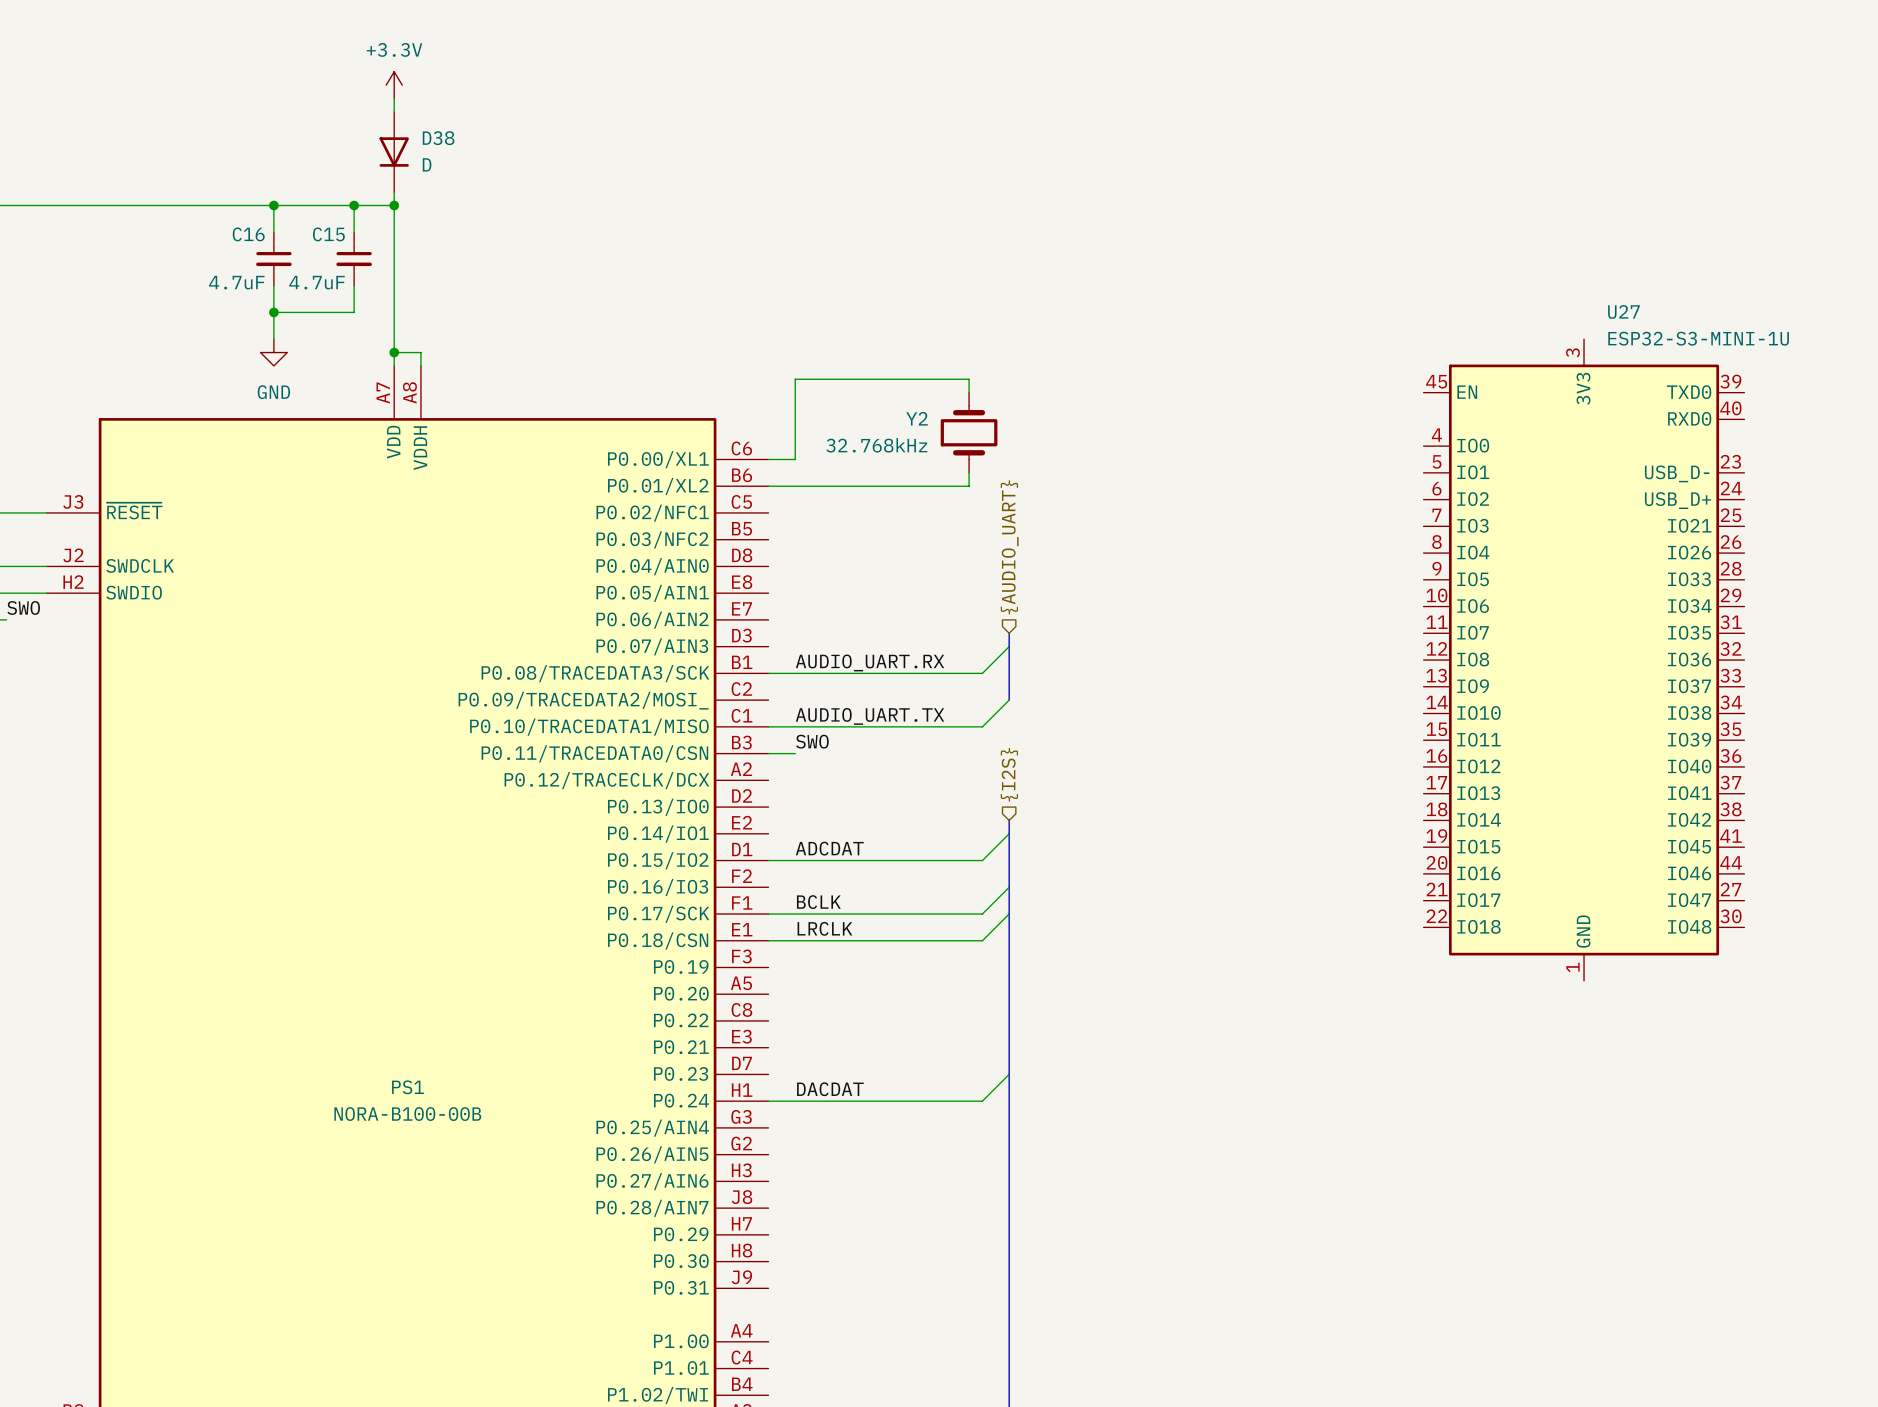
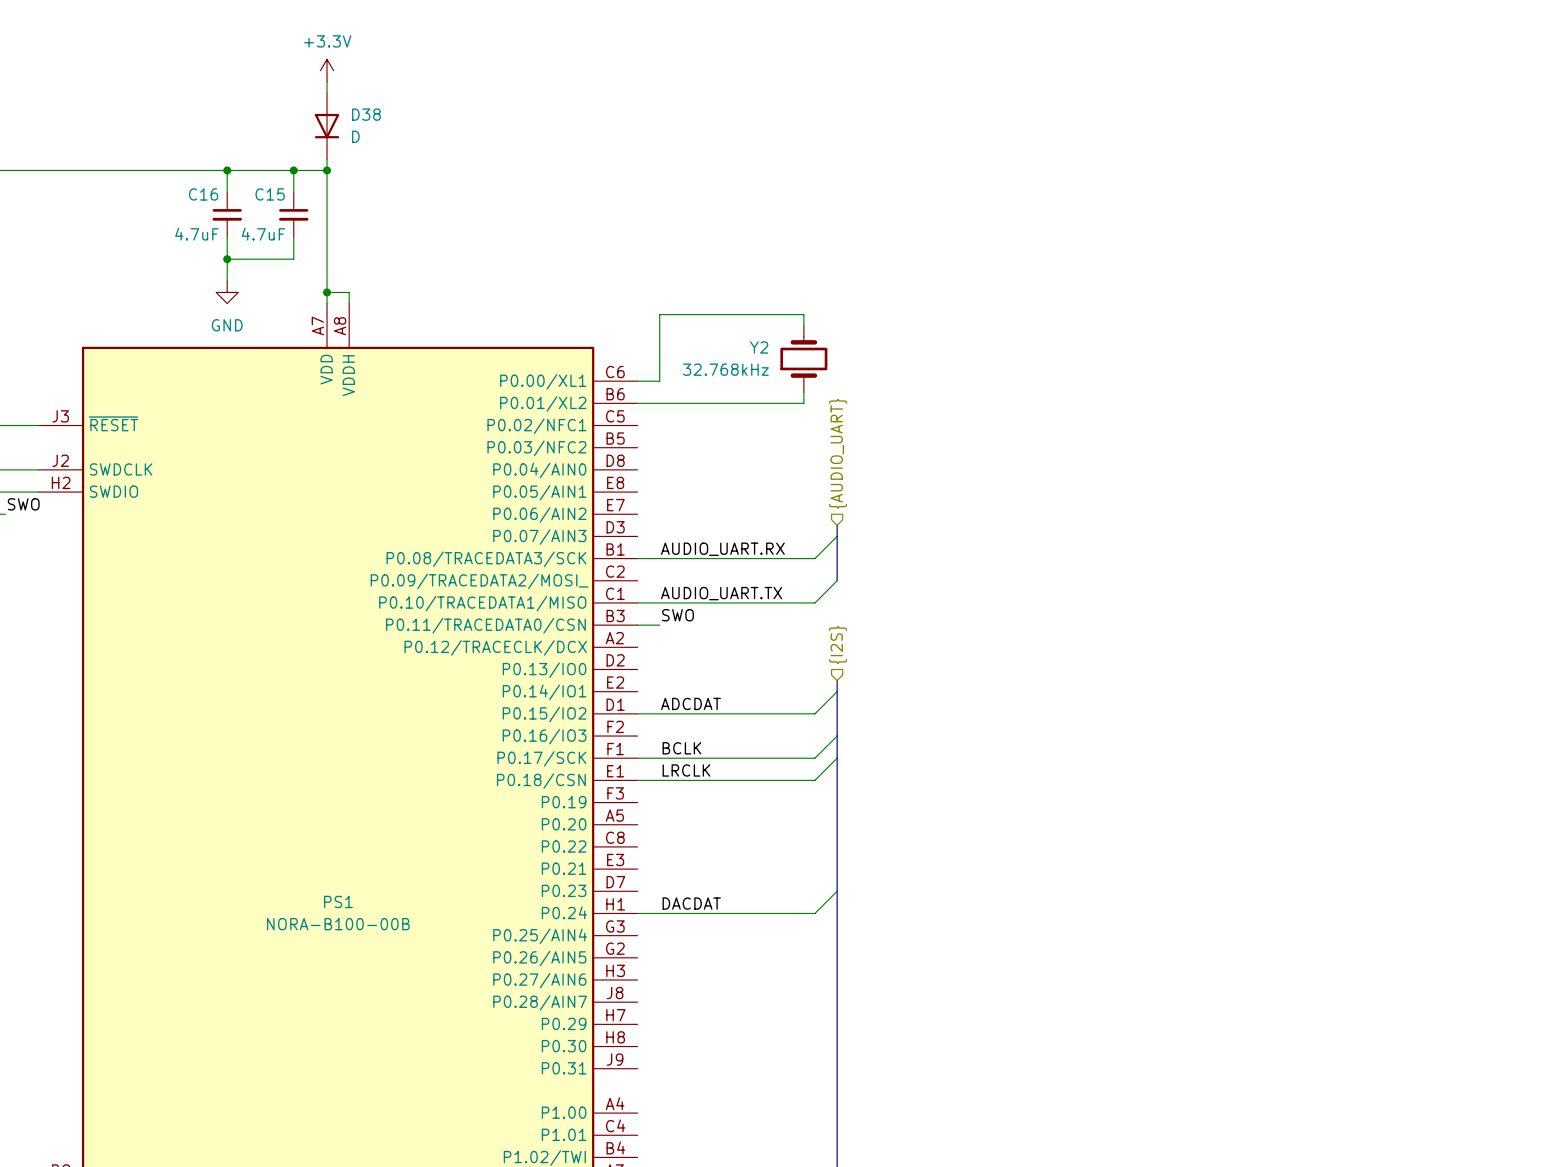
U27: ESP32-S3-MINI-1U (1584, 660) -> none

